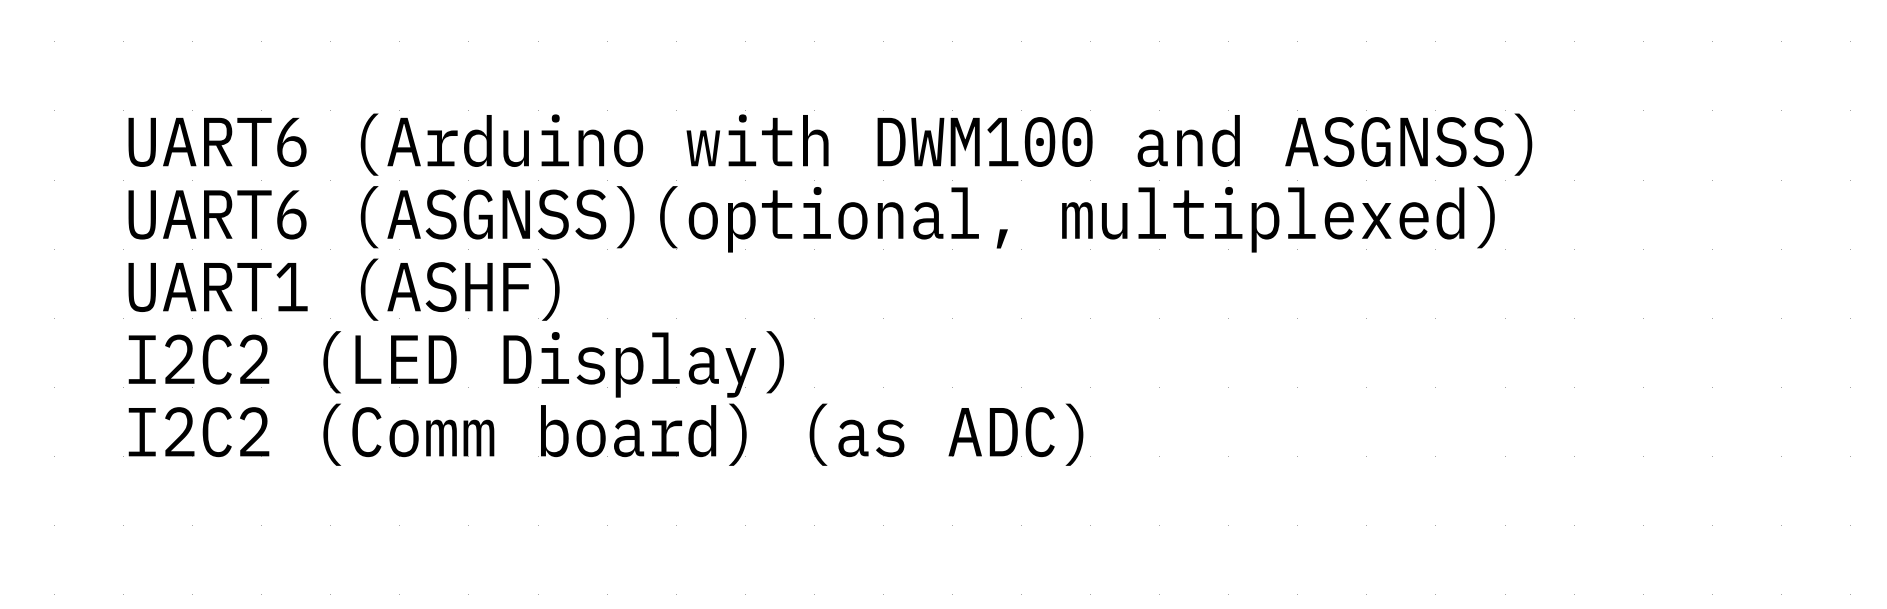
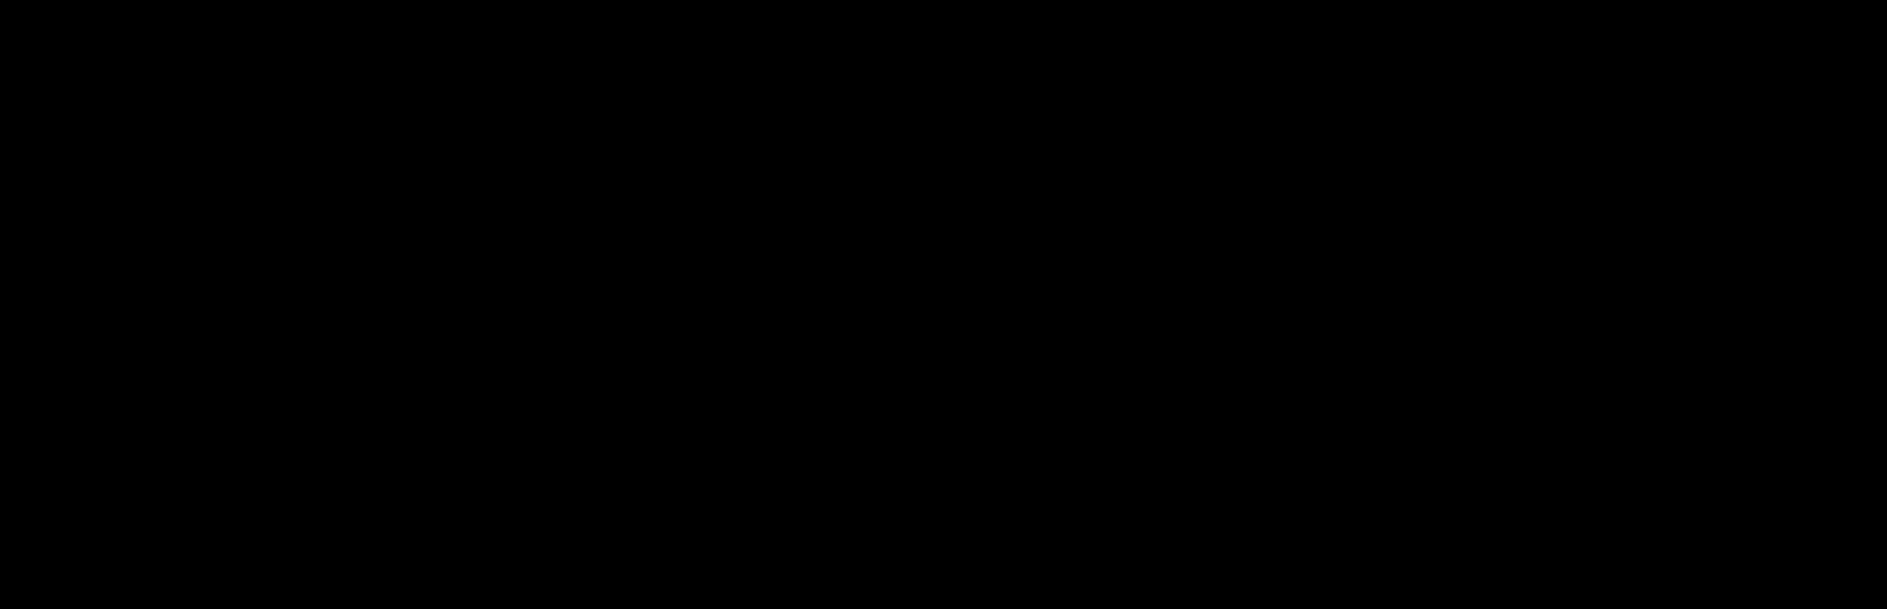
text: UART6 (Arduino with DWM100 and ASGNSS) (830, 144) -> none
text: UART6 (ASGNSS)(optional, multiplexed) (811, 219) -> none
text: UART1 (ASHF) (344, 289) -> none
text: I2C2 (LED Display) (456, 364) -> none
text: I2C2 (Comm board) (as ADC) (606, 434) -> none

